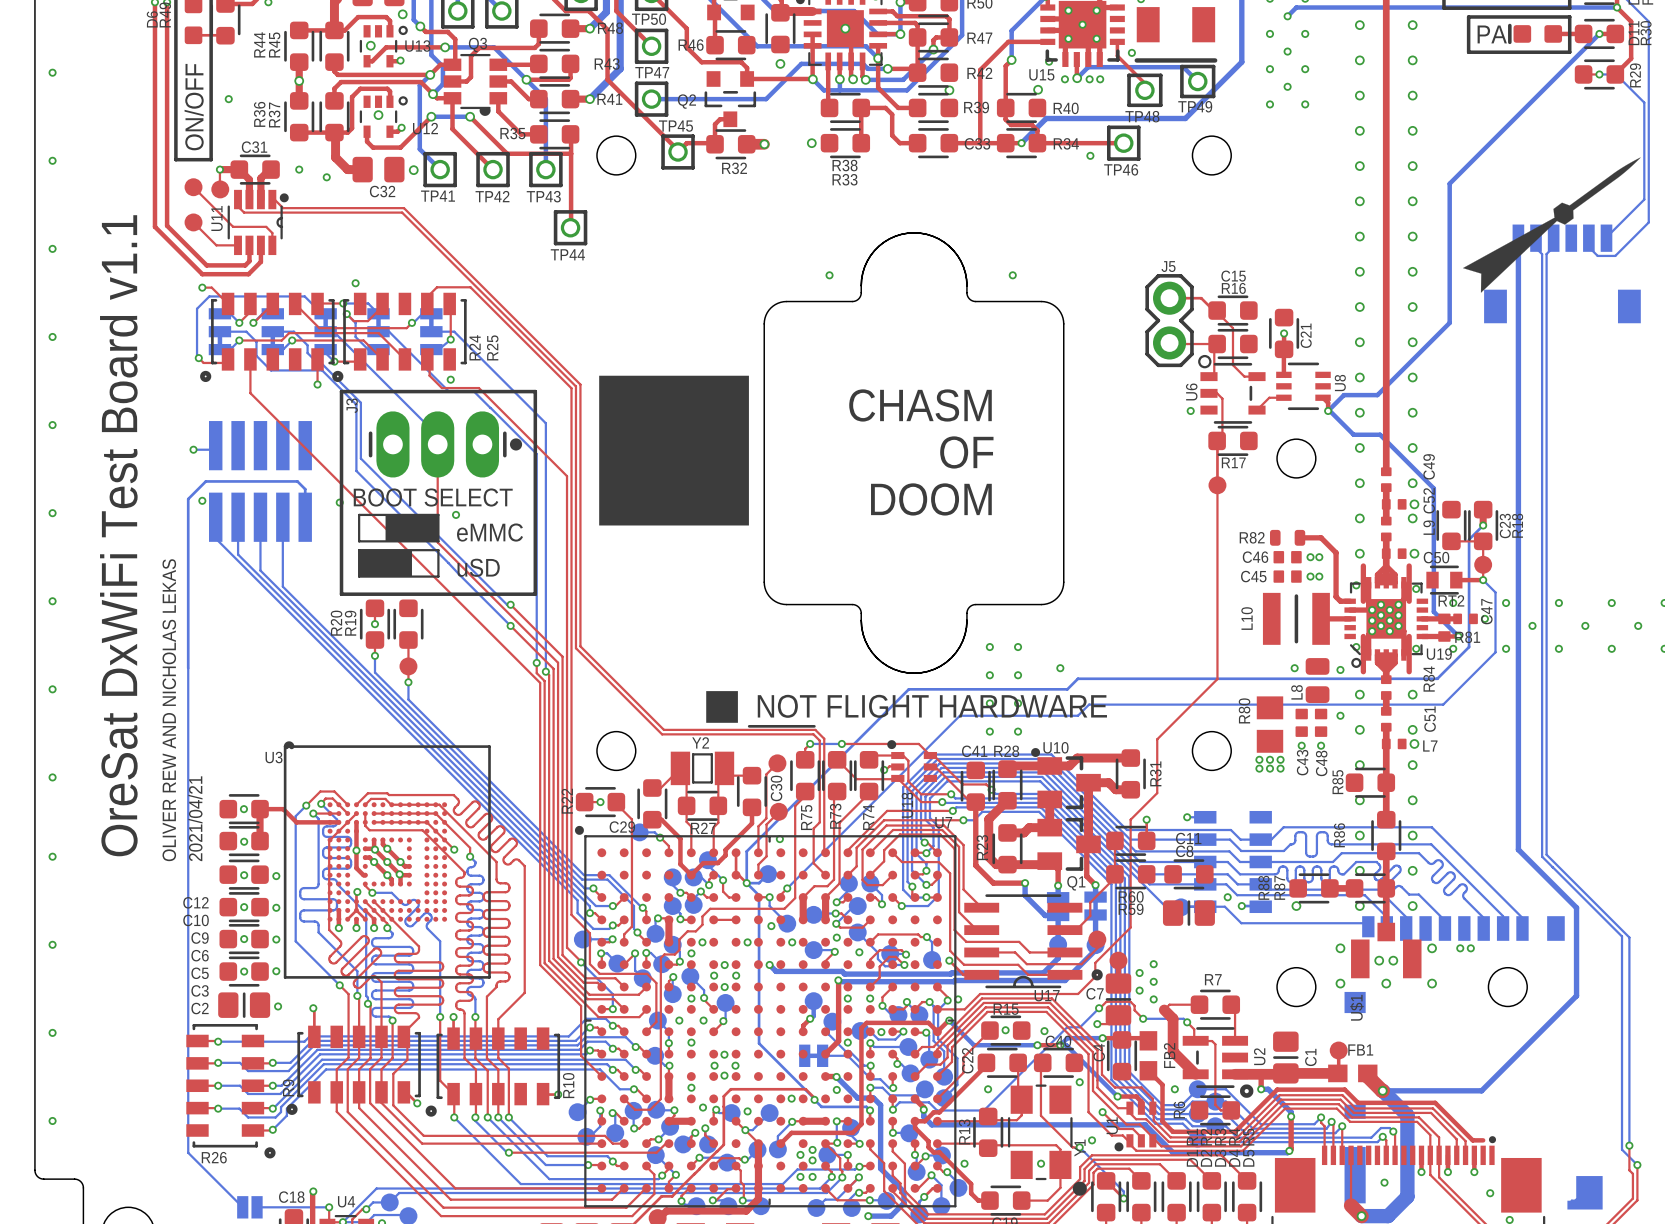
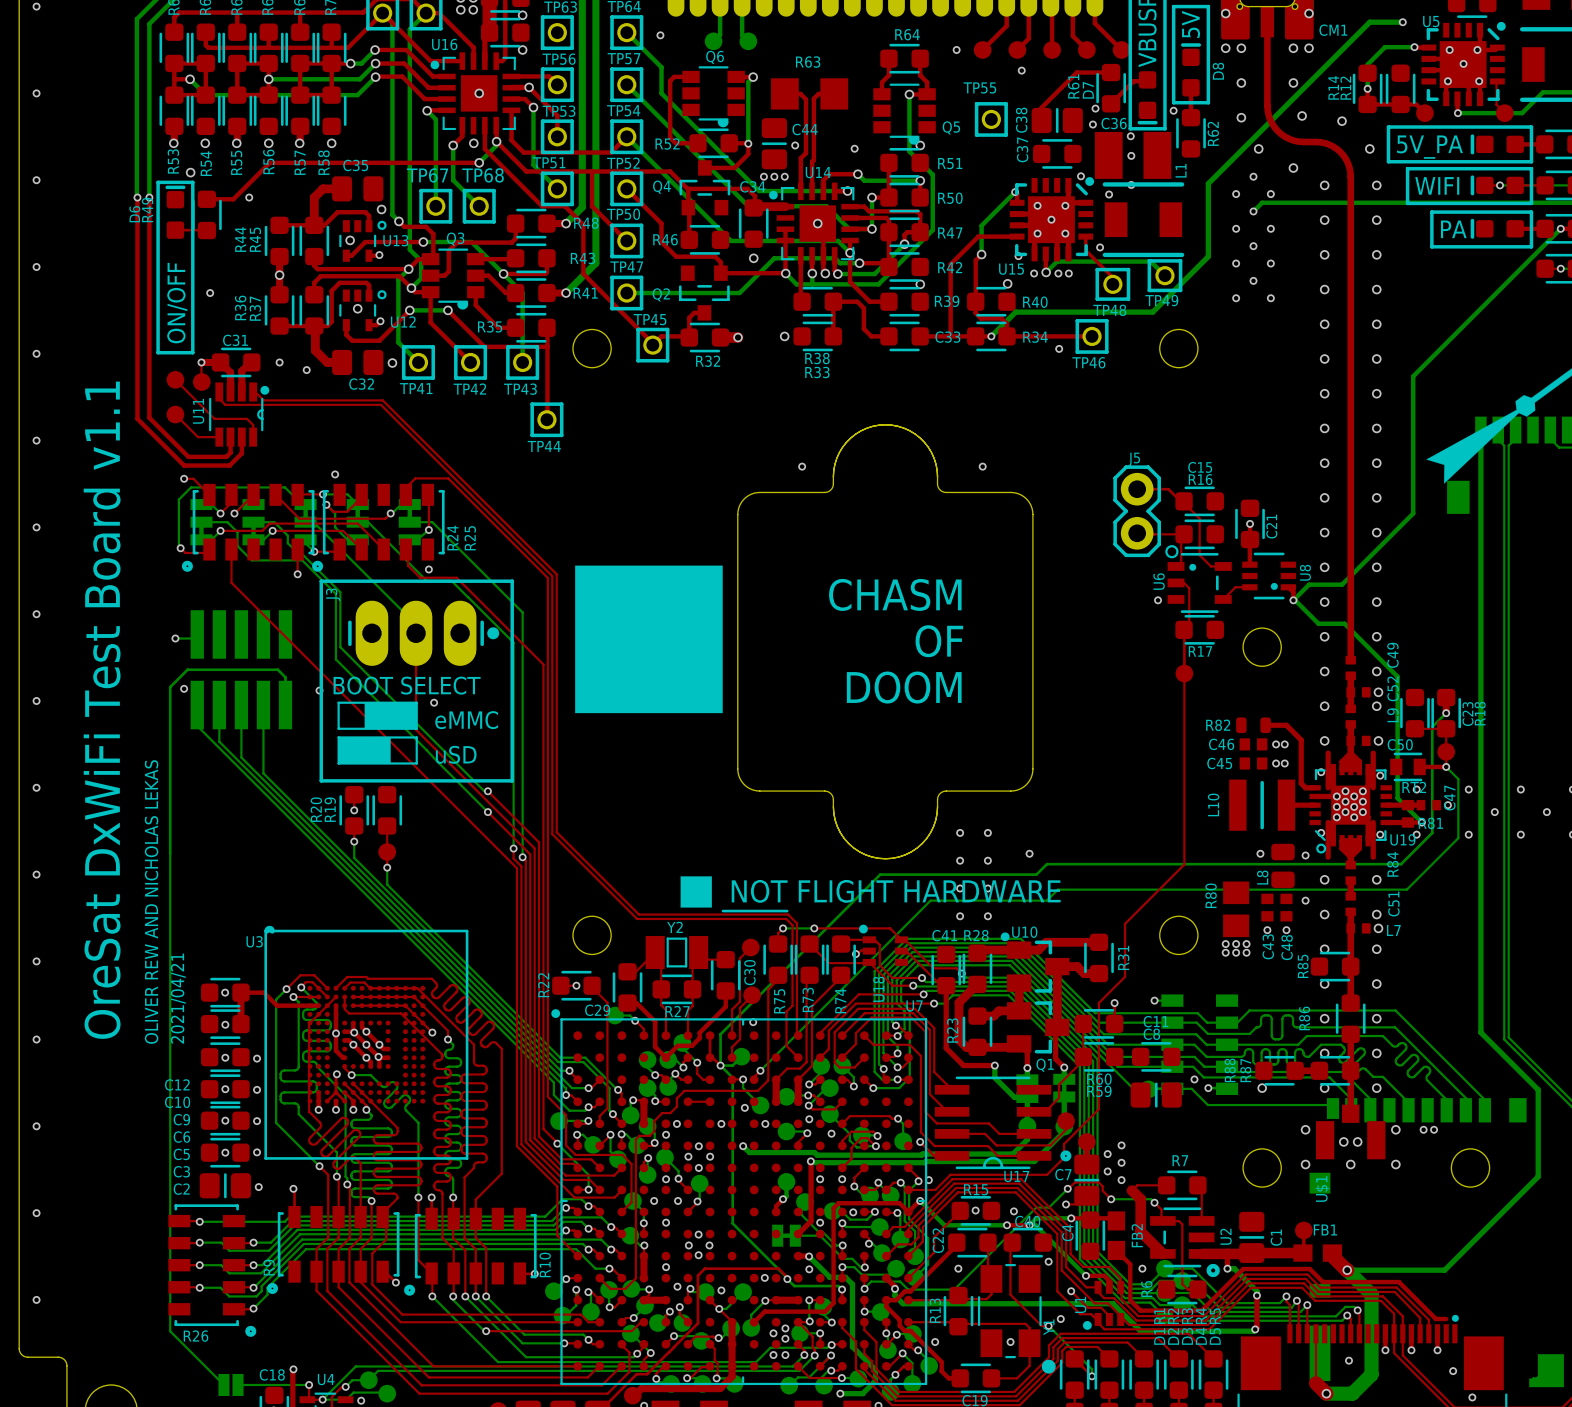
U6 footprint: [1198, 354, 1266, 424] -> [1165, 545, 1232, 613]
U8 footprint: [1276, 362, 1331, 411] -> [1242, 552, 1297, 600]

